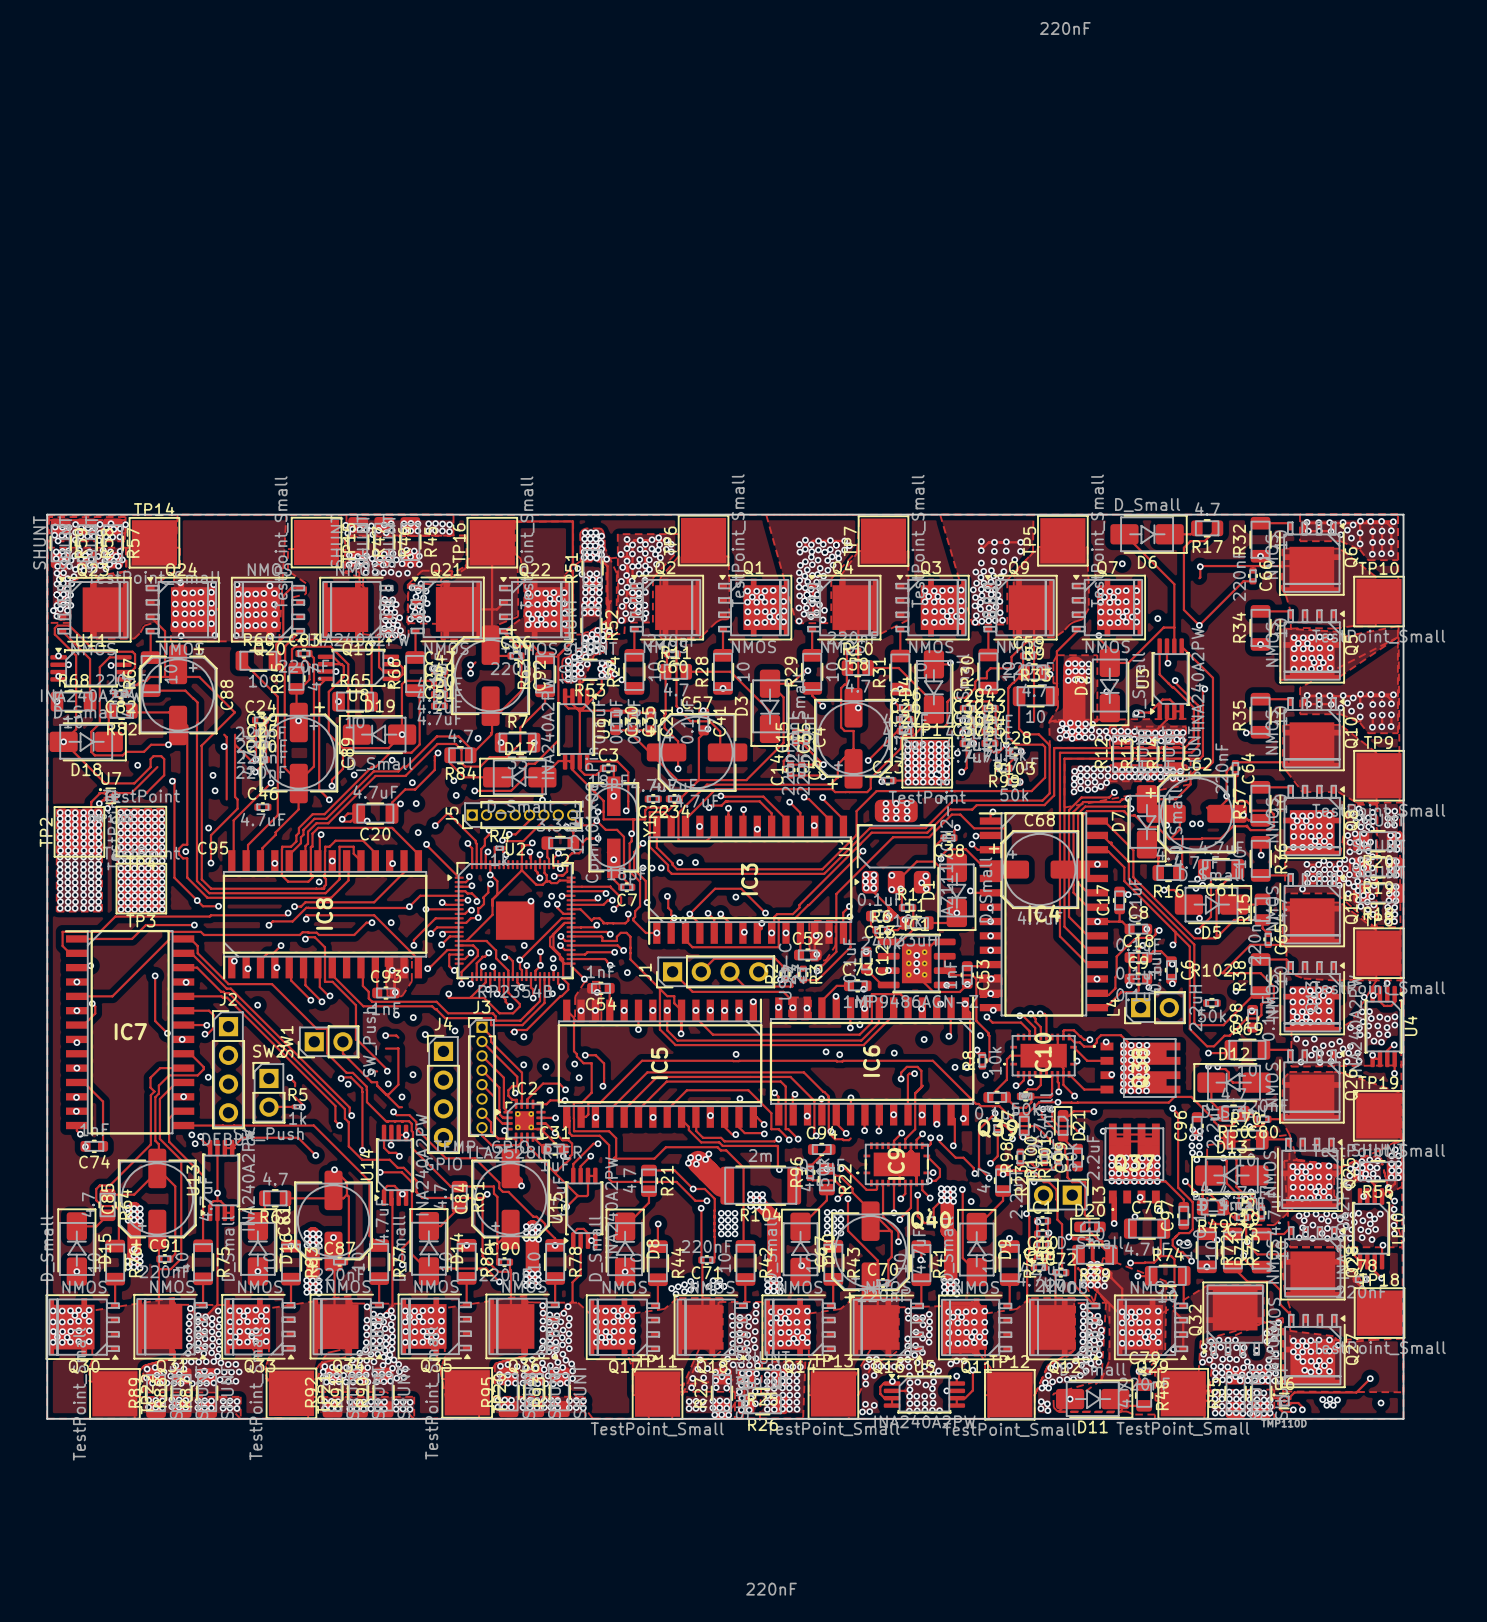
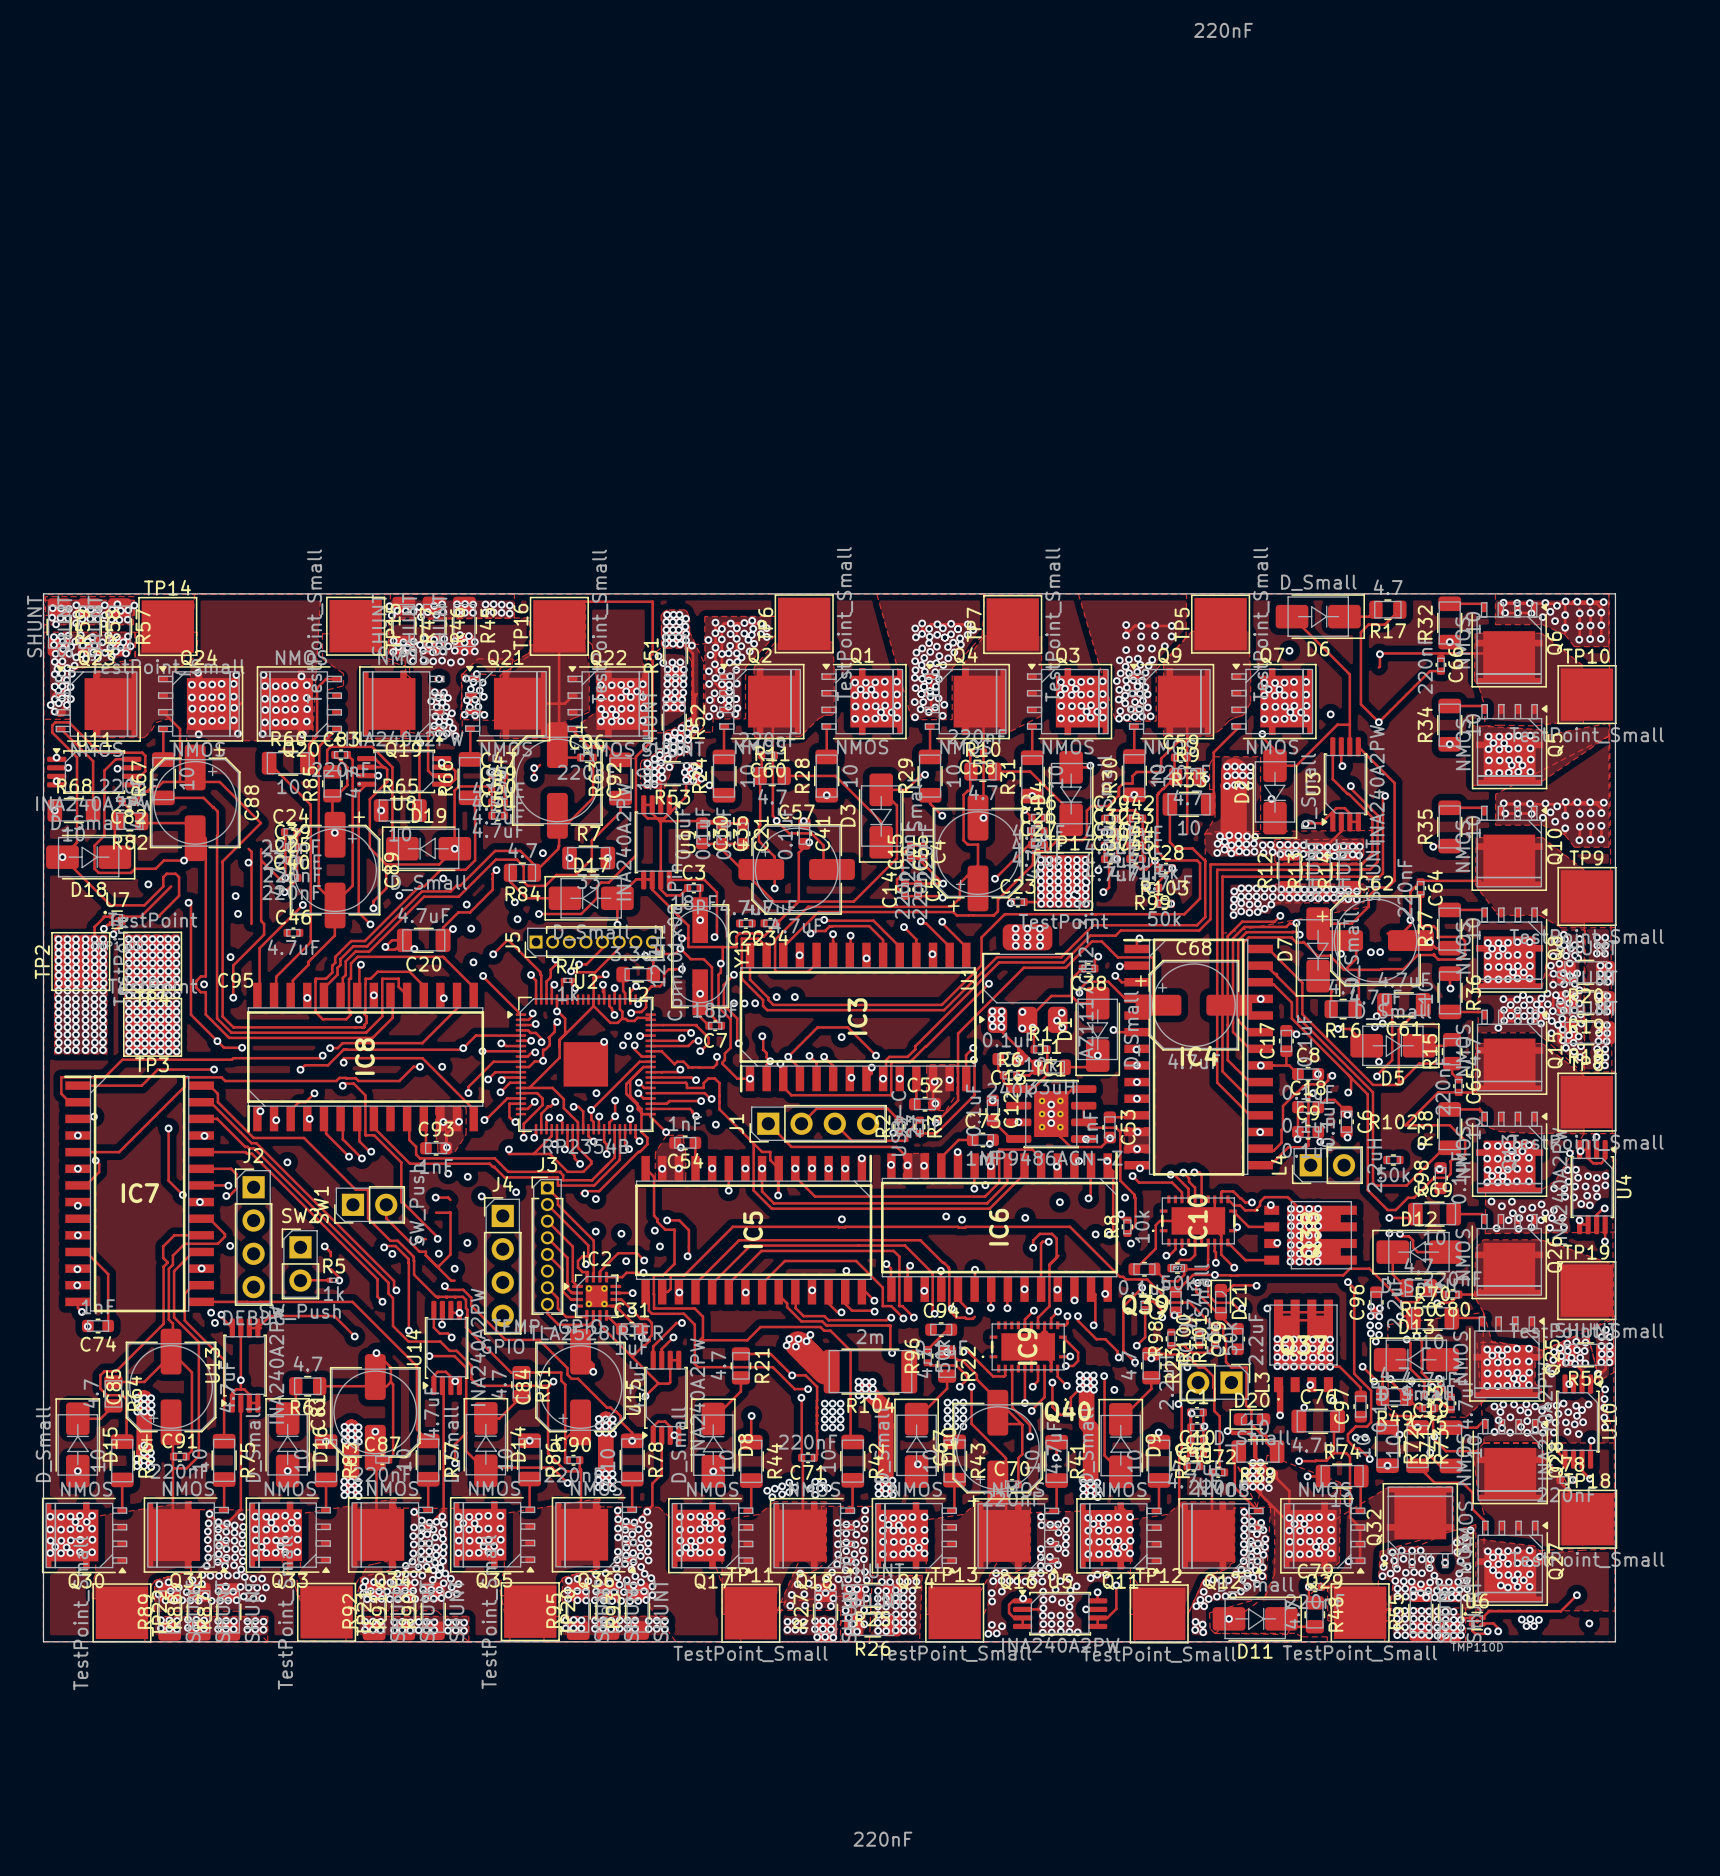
track: (944, 1302) (976, 1301) (973, 1304) (946, 1304) -> none
track: (972, 1350) (946, 1351) -> none
track: (944, 1352) (976, 1353) -> none

